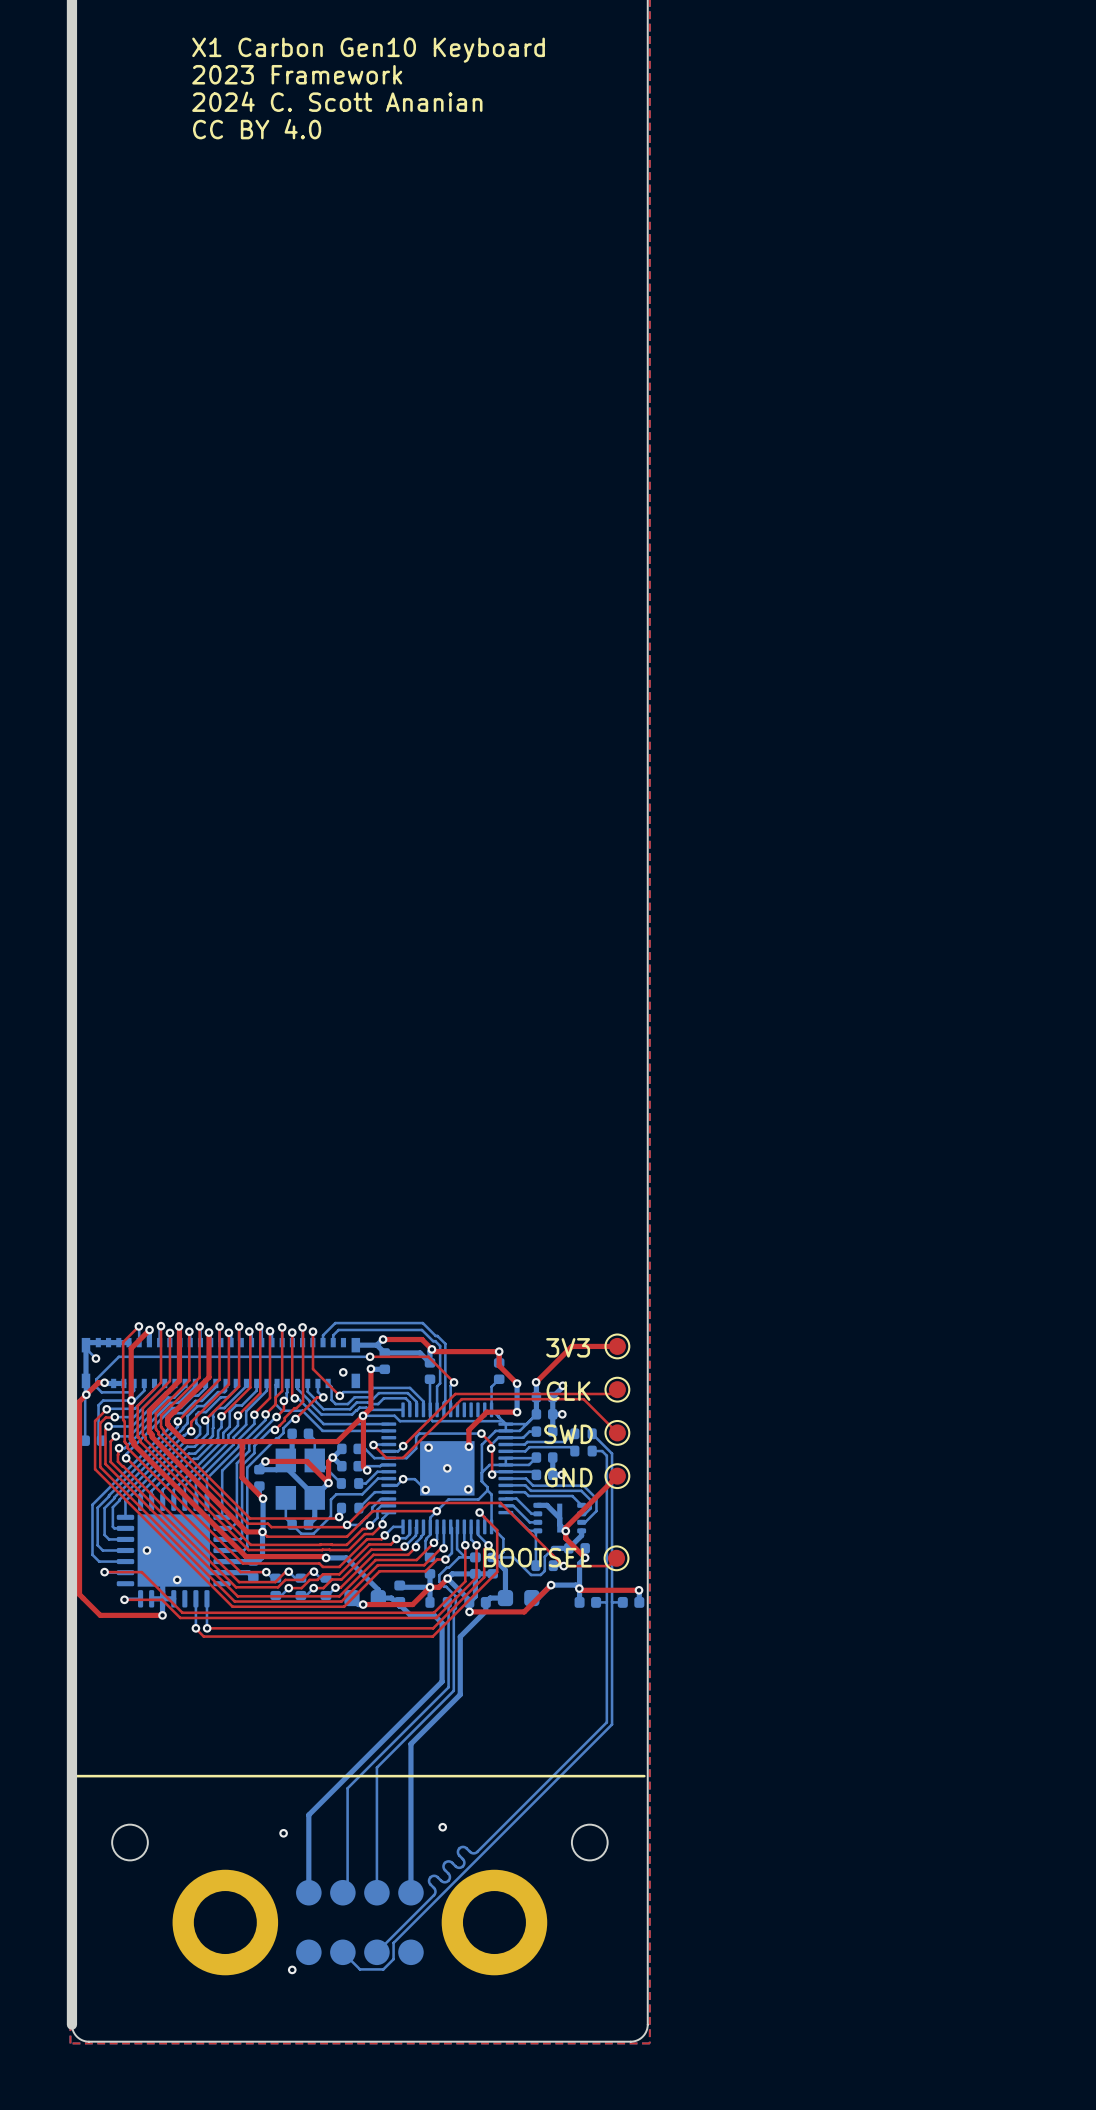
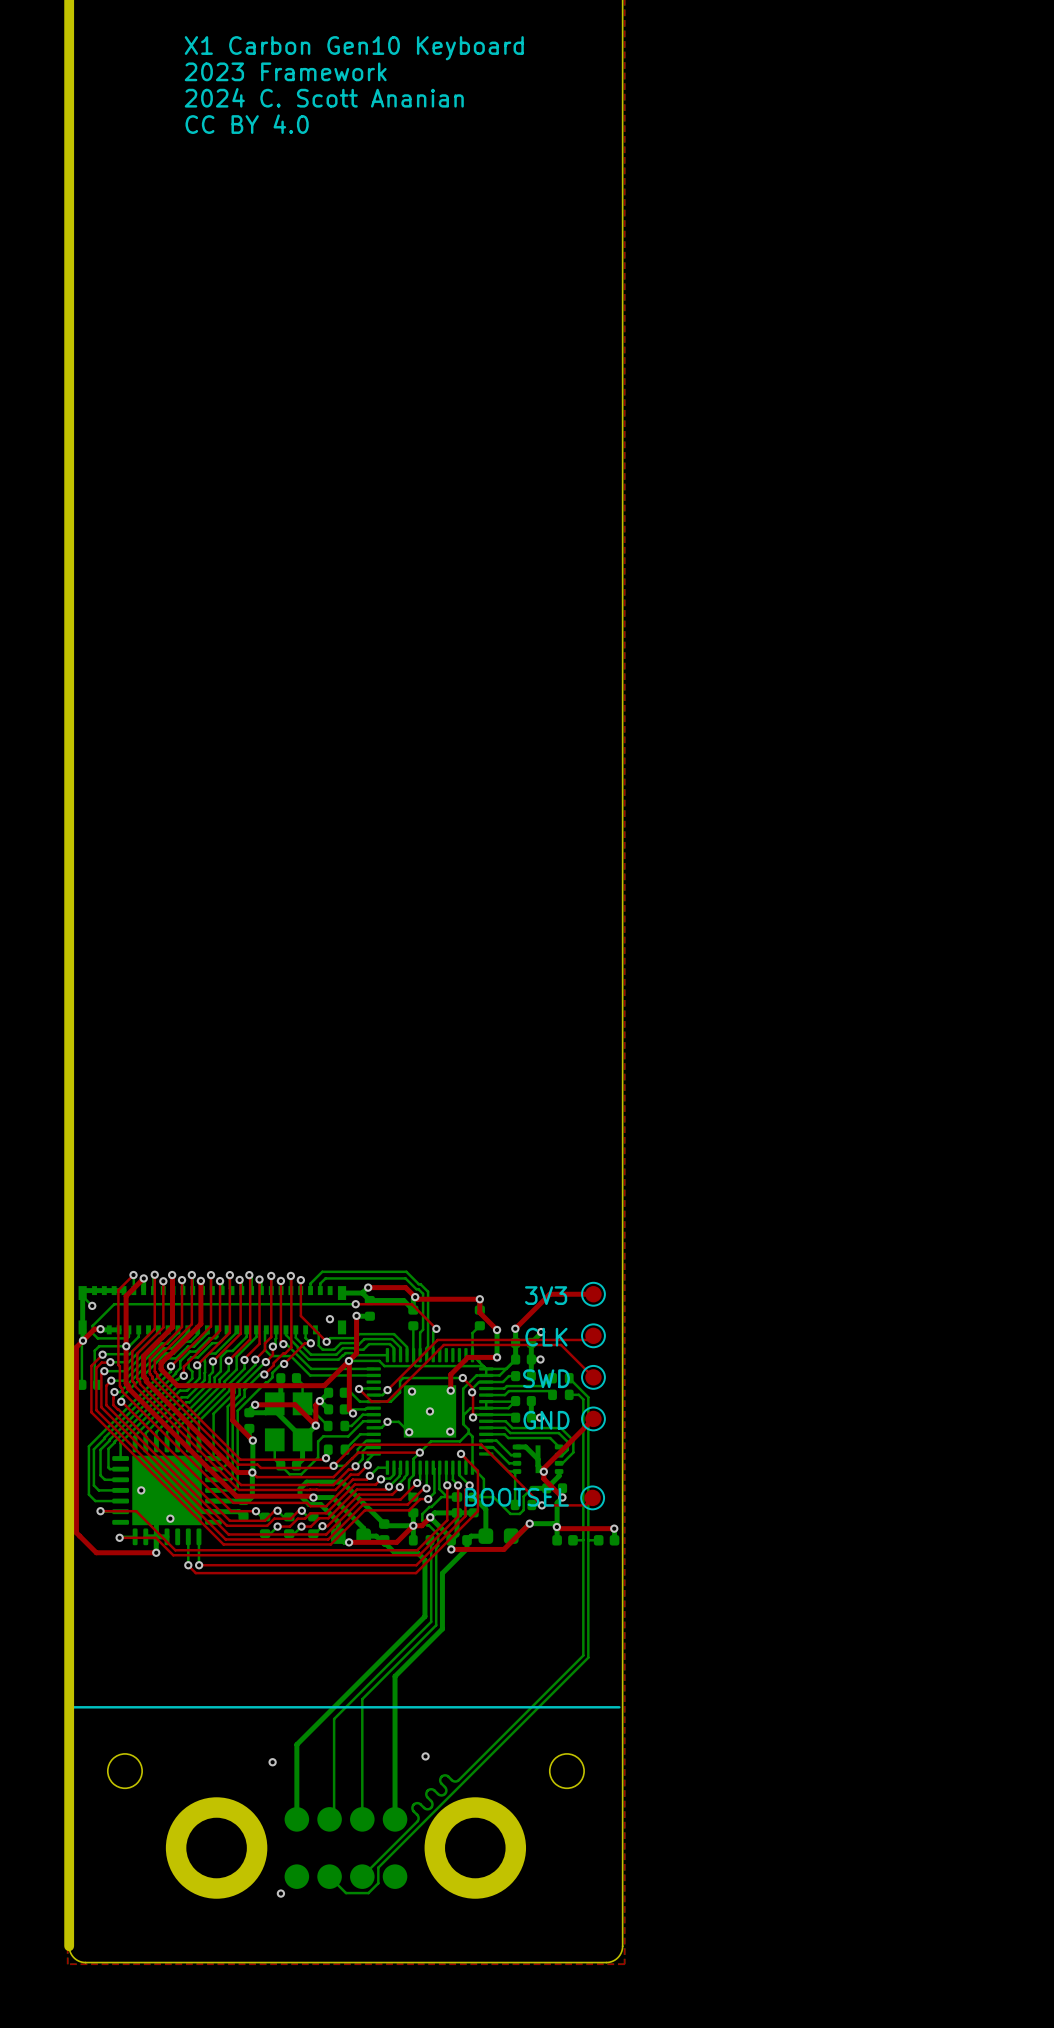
bottom track: none -> (384, 1524) (342, 1482) (306, 1482) (300, 1488) (300, 1495) (309, 1504) (320, 1504) (338, 1522) (338, 1536)

